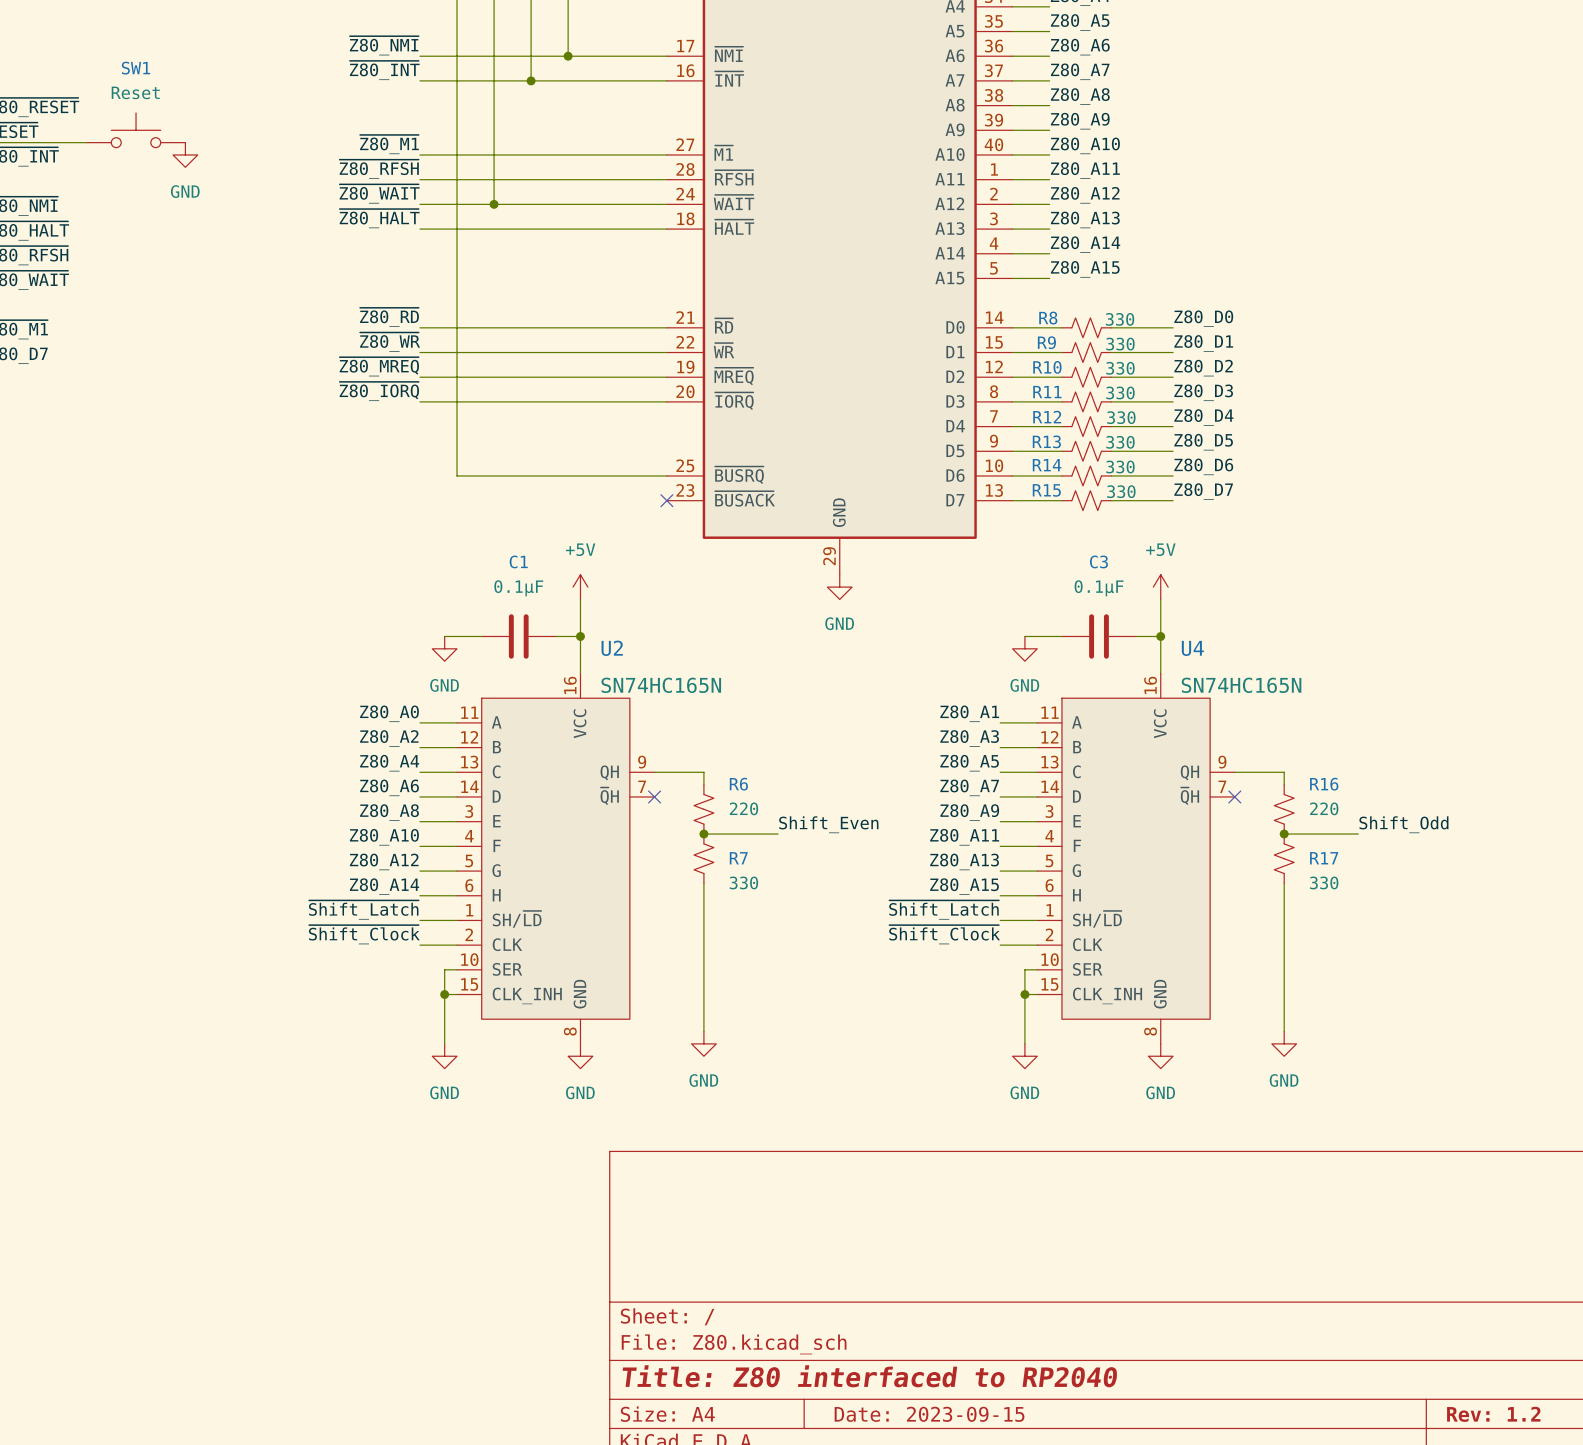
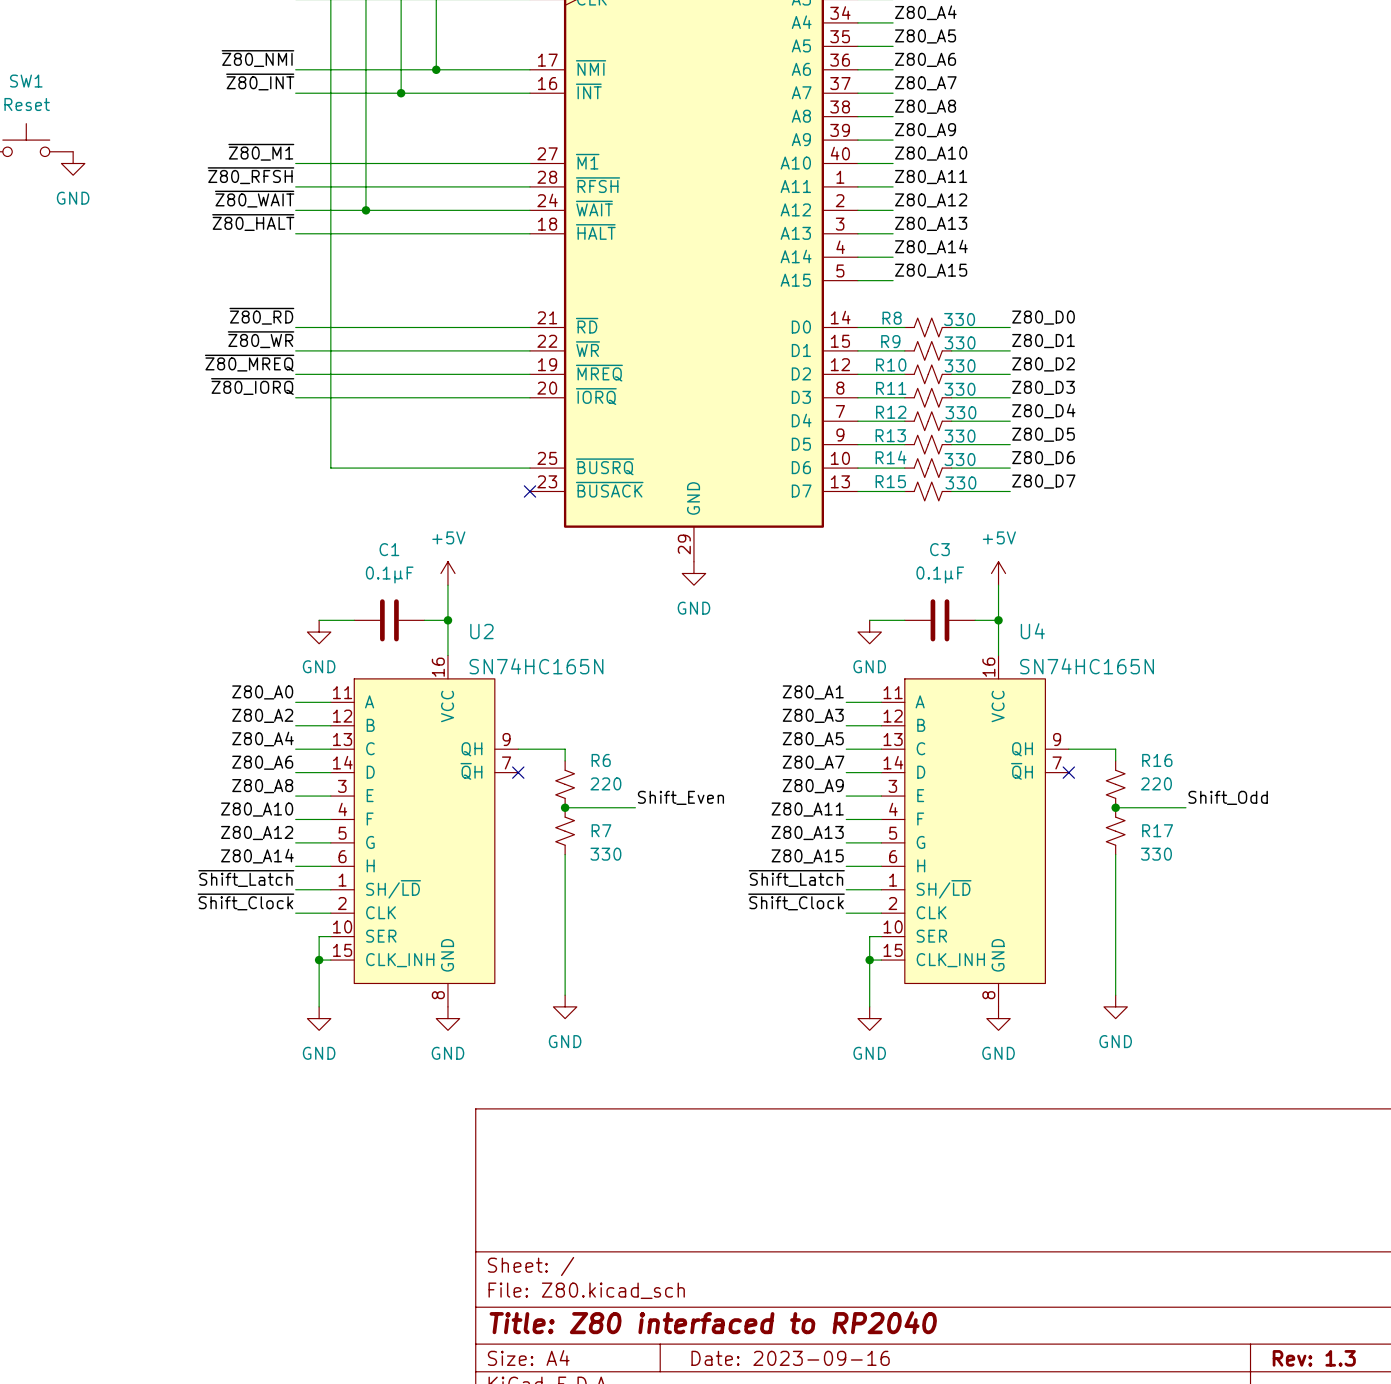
title block: Date: 2023-09-15 (929, 1414) -> Date: 2023-09-16 (790, 1358)
title block: Rev: 1.2 (1493, 1414) -> Rev: 1.3 (1314, 1358)

